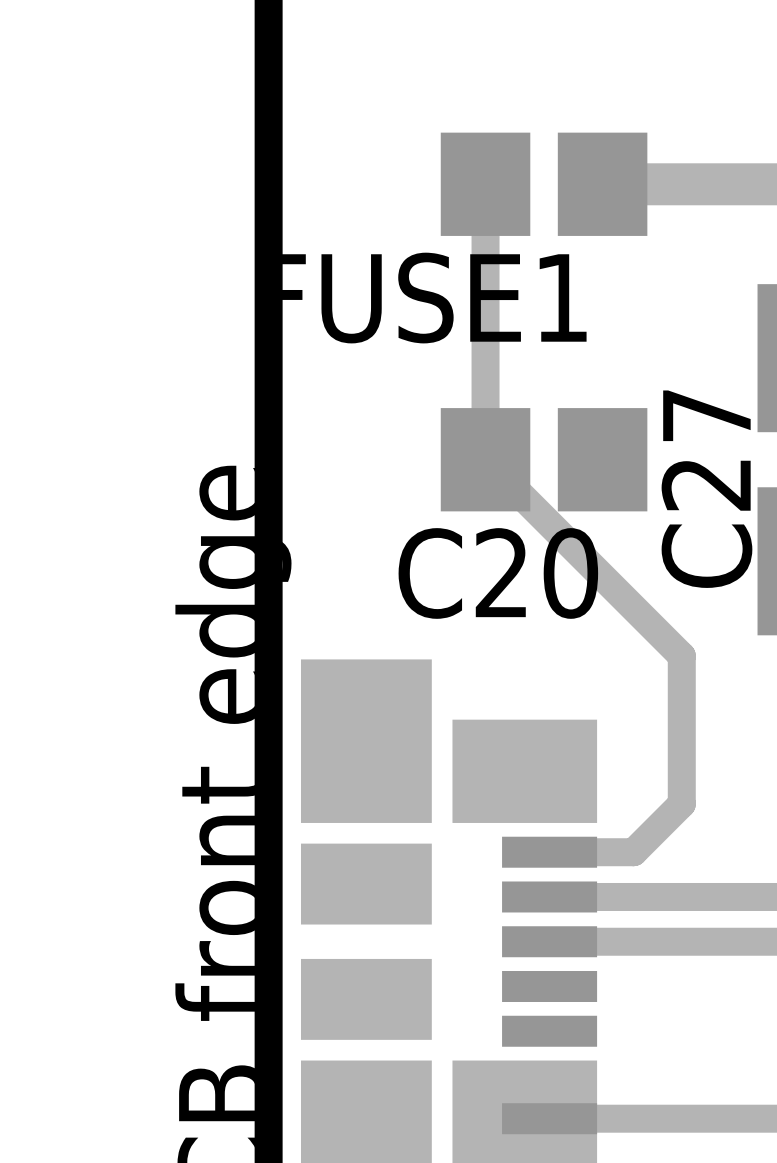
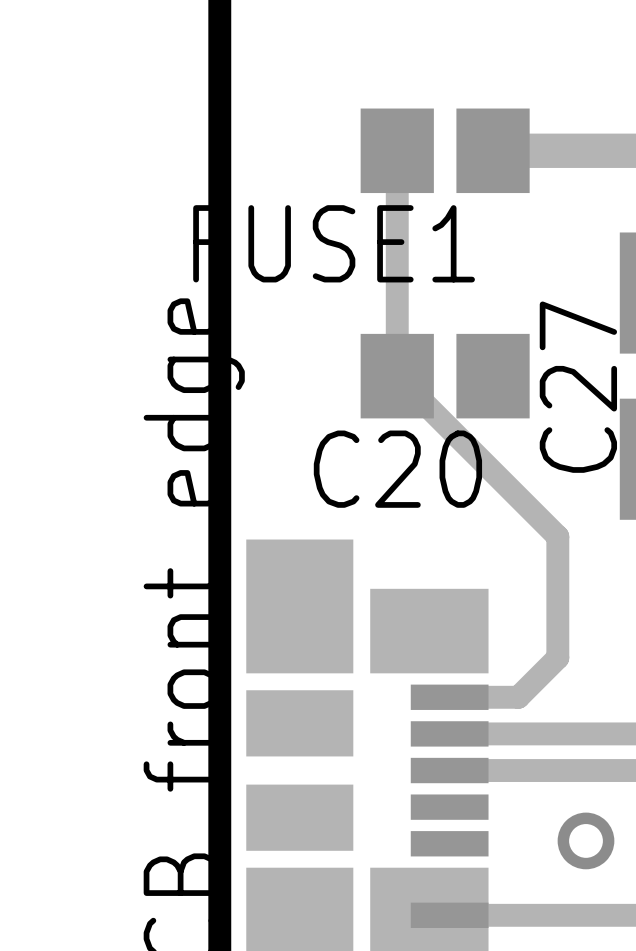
via: none -> (585, 840)

